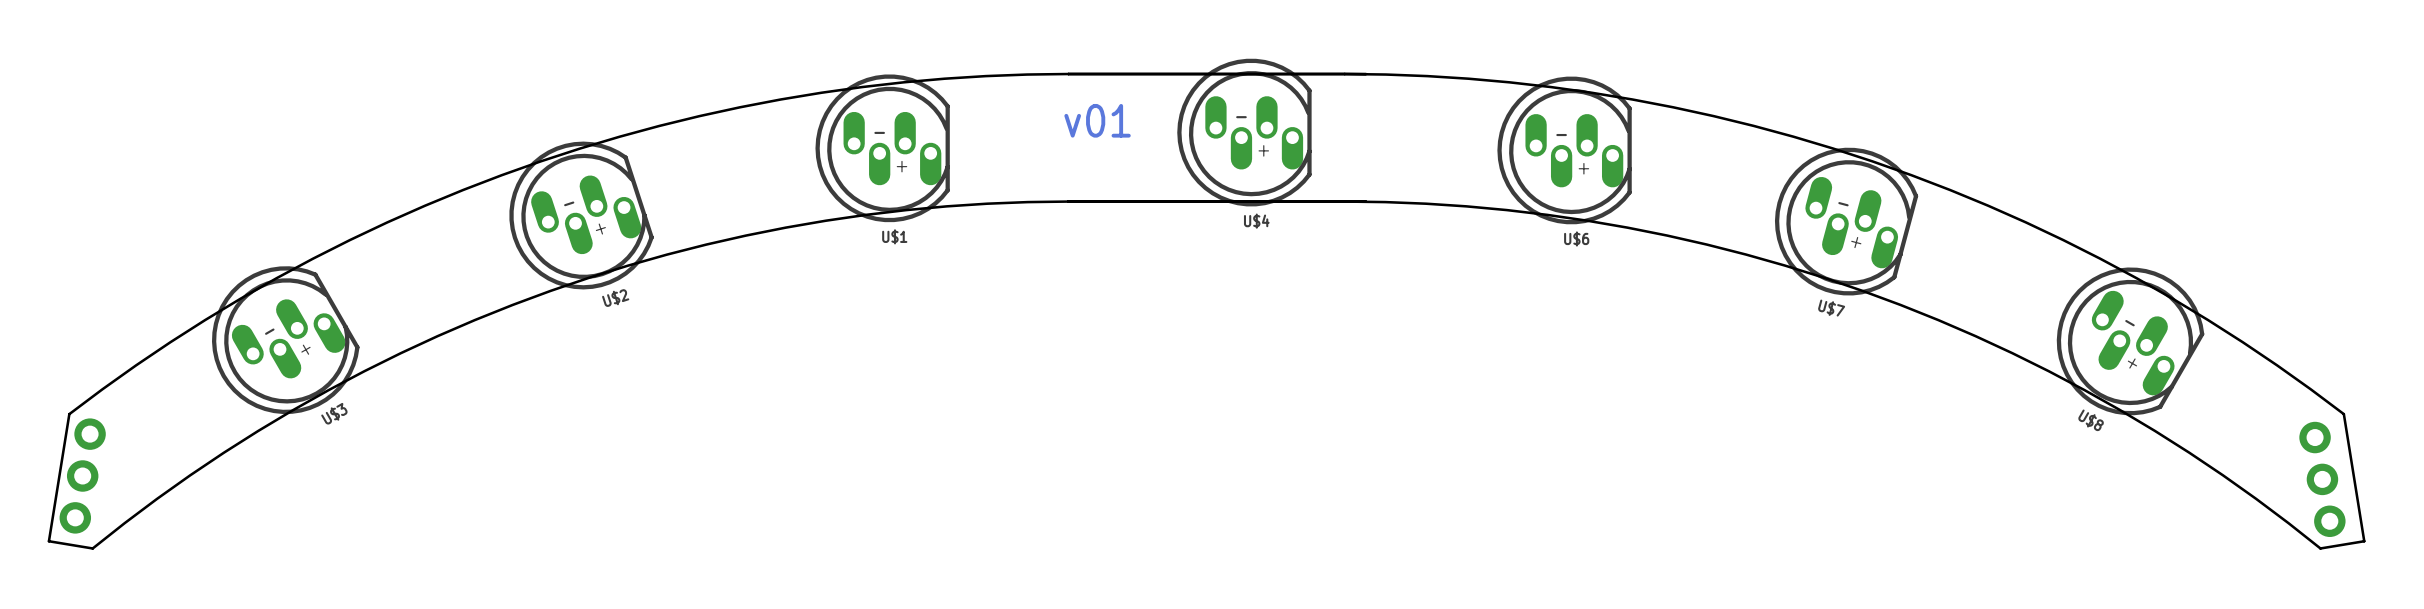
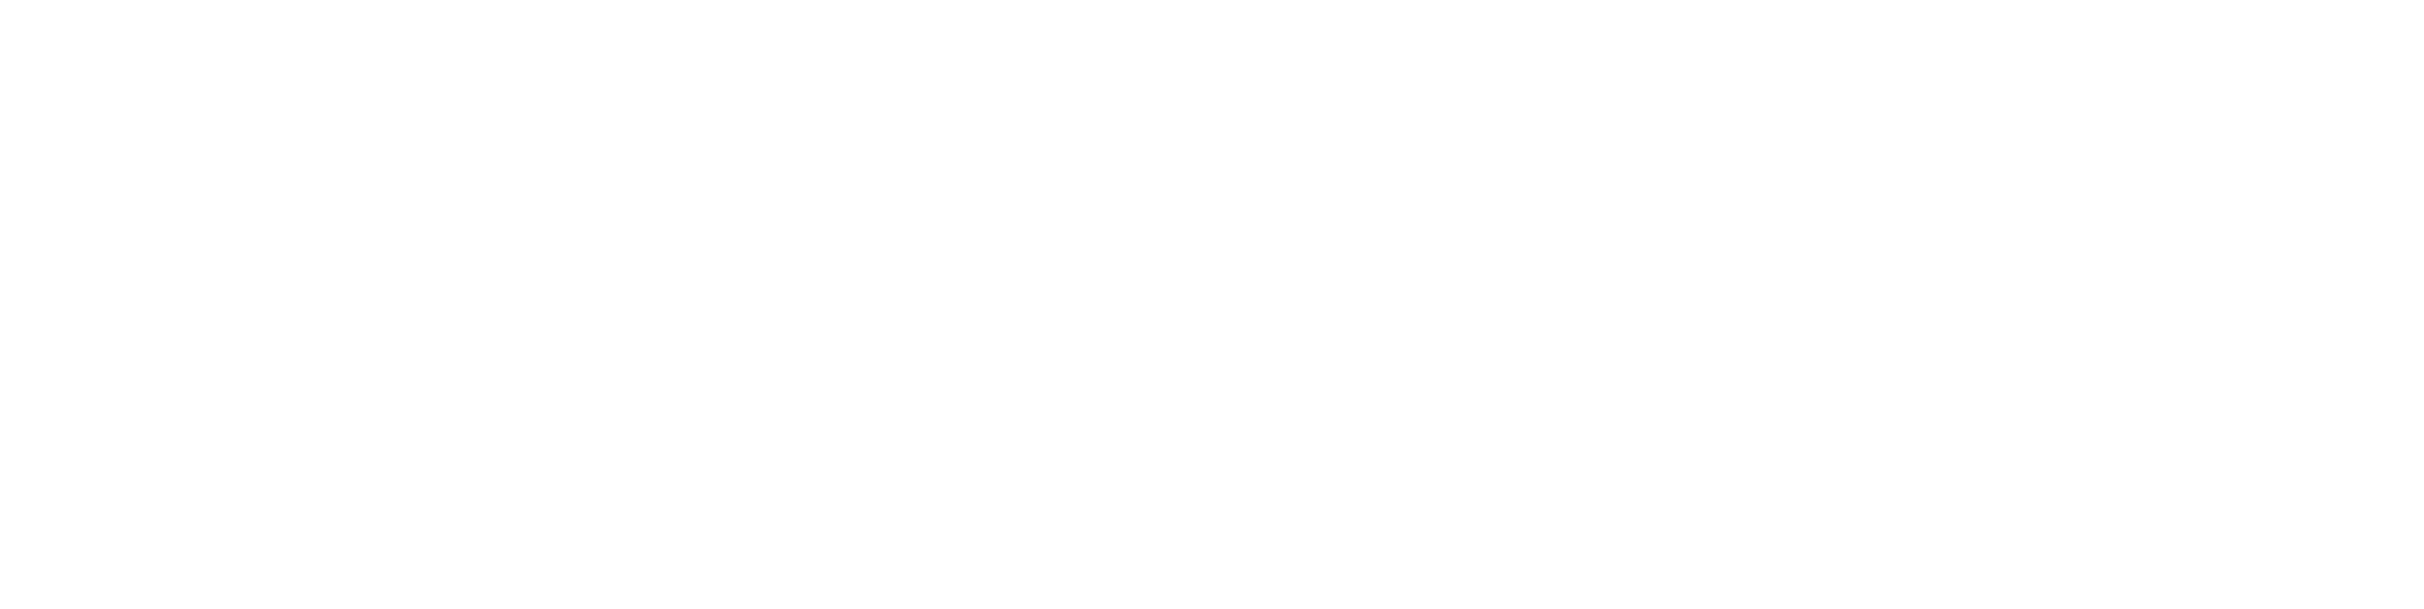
board edge: (1344, 74) (1427, 76) (1509, 82) (1591, 92) (1673, 107) (1753, 125) (1872, 161) (1950, 189) (2026, 222) (2100, 258) (2208, 320) (2277, 365) (2343, 414) (2364, 541) (2320, 548) (2256, 498) (2189, 452) (2084, 390) (1975, 336) (1900, 304) (1824, 277) (1706, 244) (1587, 220) (1466, 206) (1344, 201) -> none
board edge: (1366, 74) (1027, 74) (944, 78) (862, 87) (780, 99) (659, 125) (580, 148) (501, 175) (387, 222) (276, 278) (170, 342) (69, 414) (48, 541) (92, 548) (157, 498) (223, 452) (293, 410) (364, 371) (437, 336) (512, 304) (589, 277) (666, 254) (785, 227) (865, 214) (946, 206) (1068, 201) (1366, 201) -> none
text: v01 (1097, 120) -> none
U$4: (1244, 132) -> none
U$1: (882, 148) -> none
U$6: (1564, 150) -> none
U$2: (581, 215) -> none
U$7: (1846, 221) -> none
U$3: (285, 340) -> none
U$8: (2130, 341) -> none
part: (82, 476) -> none
part: (2322, 479) -> none

